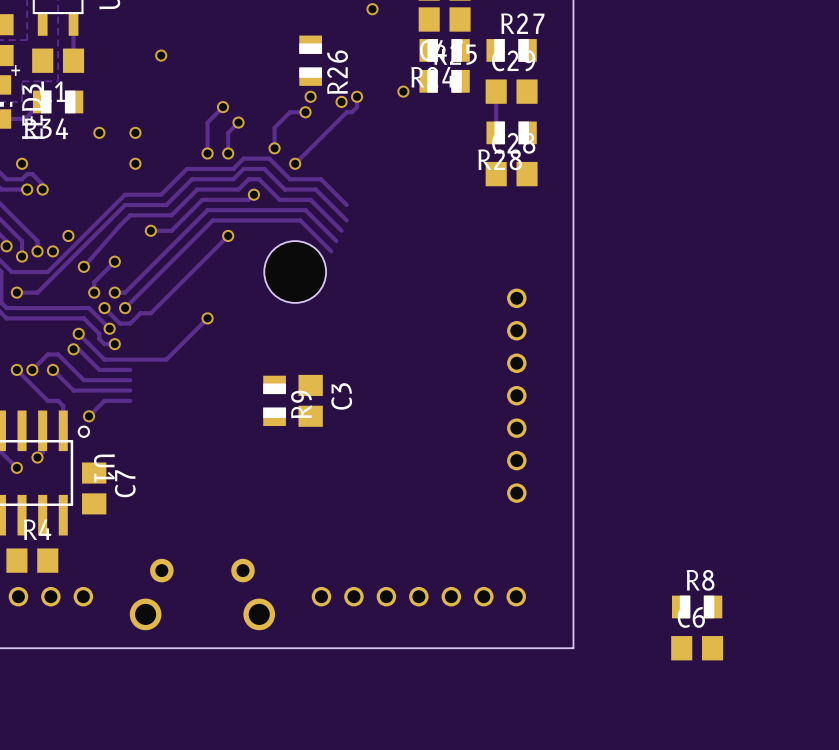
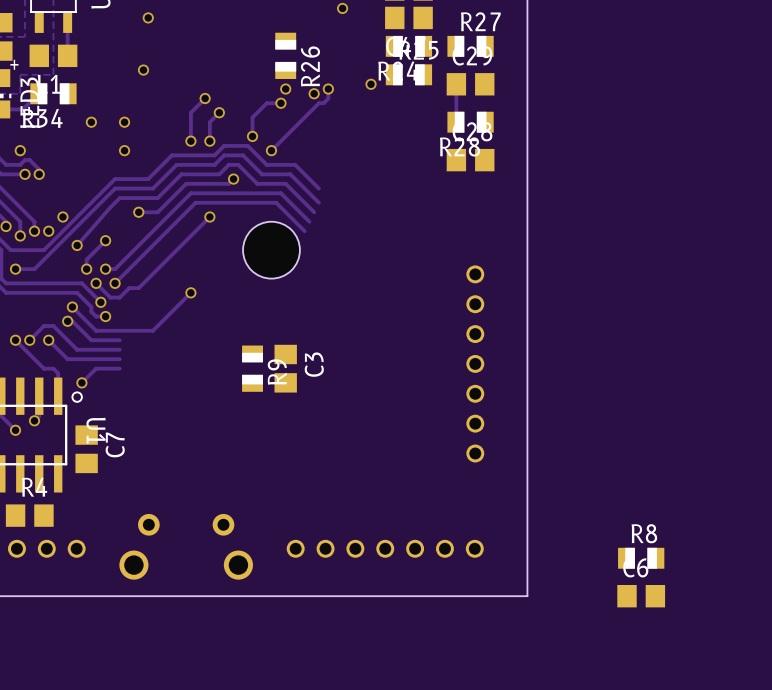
via: none -> (148, 17)
via: (161, 55) -> none
via: none -> (143, 70)

